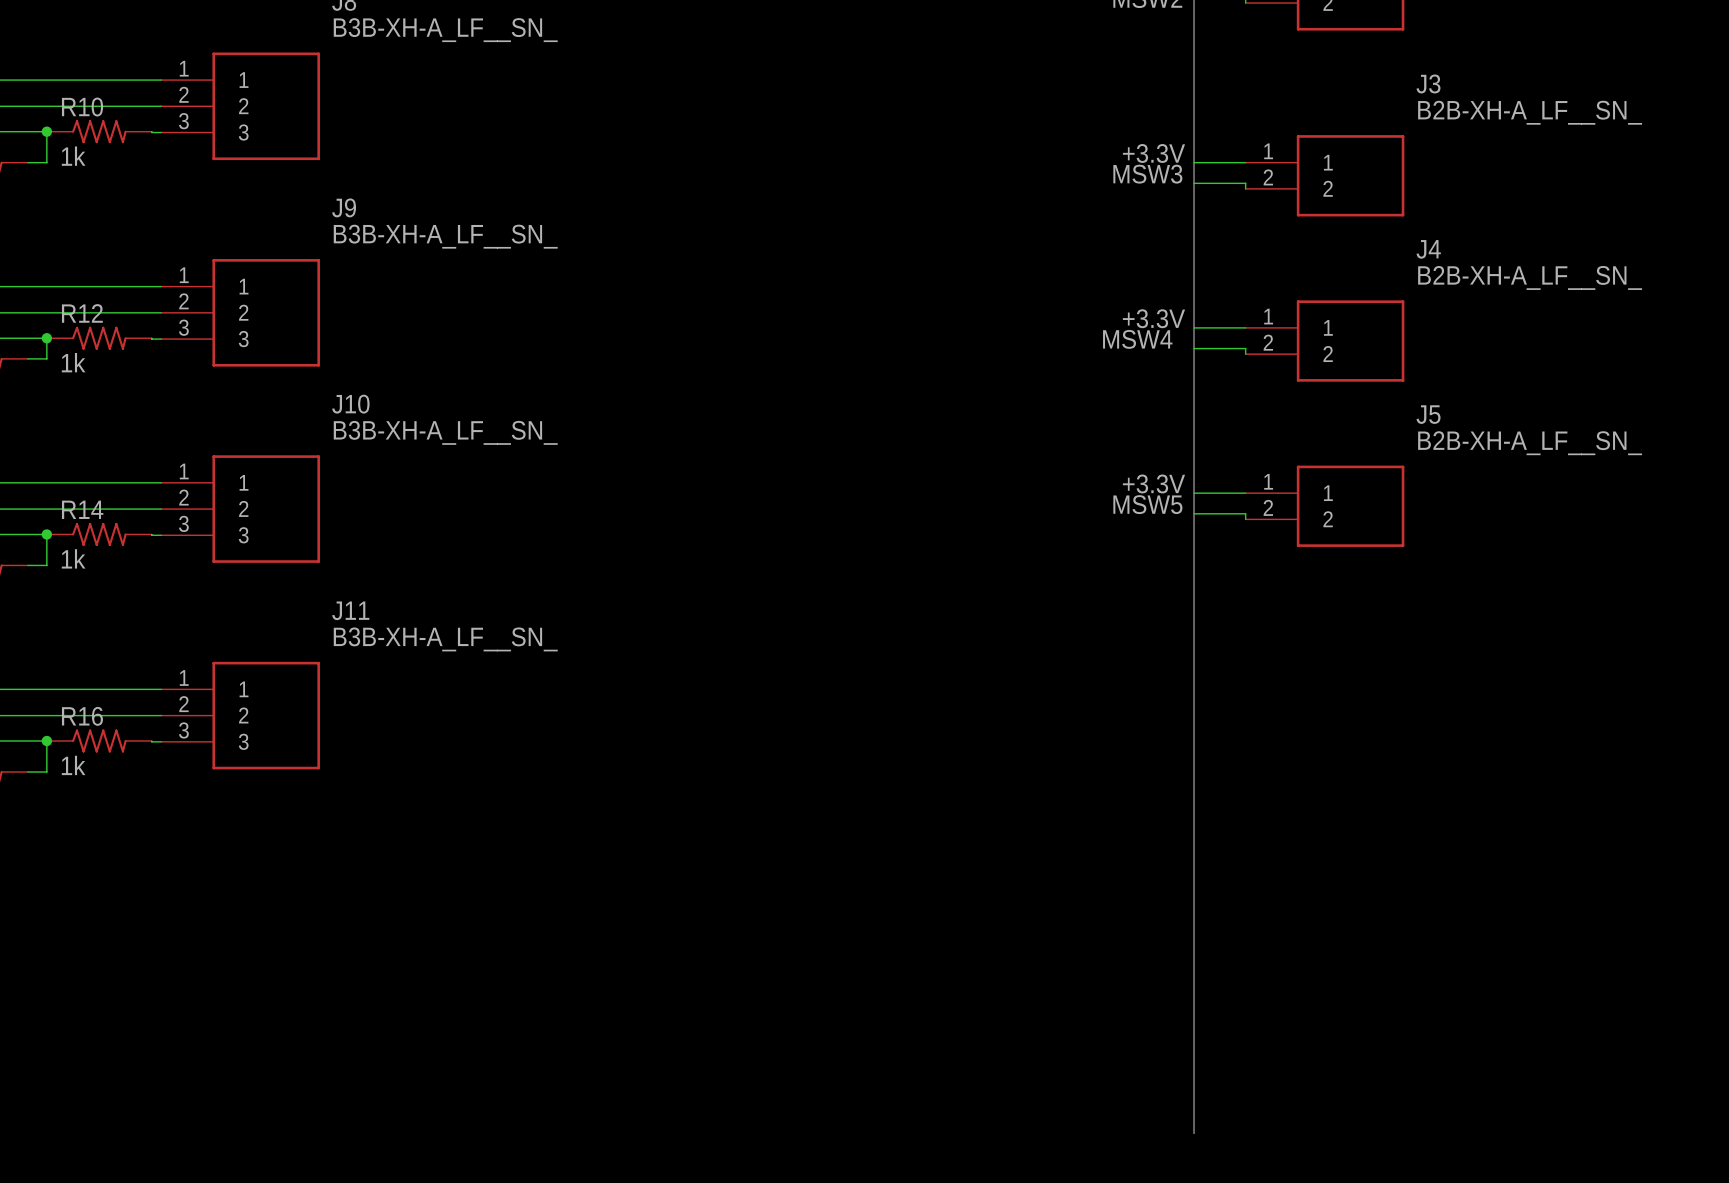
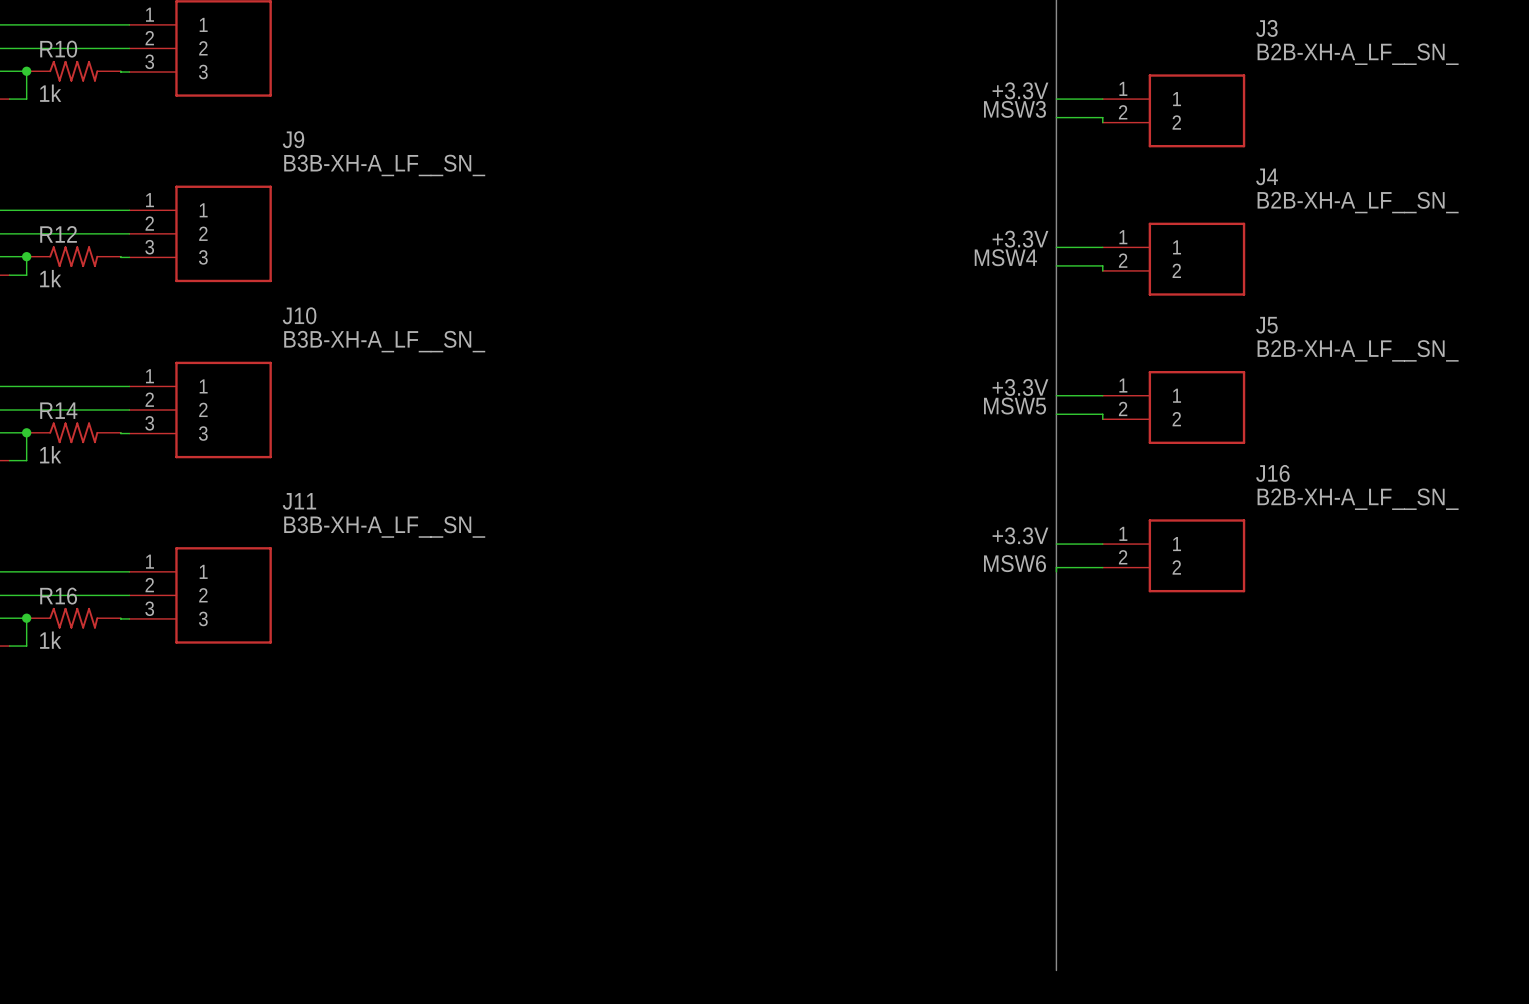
label: none -> +3.3V (1020, 535)
wire: none -> (1056, 544) (1102, 544)
J16: none -> B2B-XH-A_LF__SN_ (1173, 555)
label: none -> MSW6 (1015, 563)
wire: none -> (1102, 567) (1056, 567) (1056, 571)

